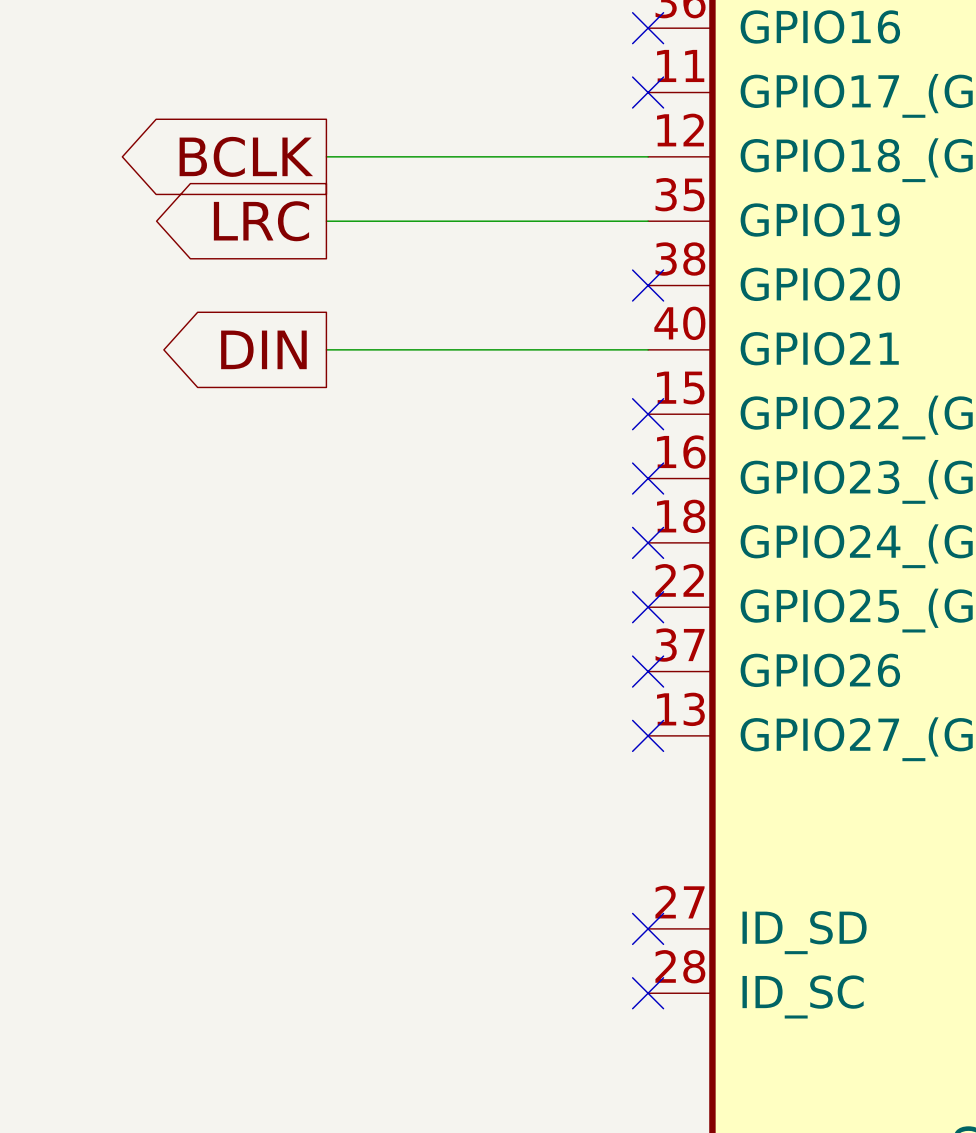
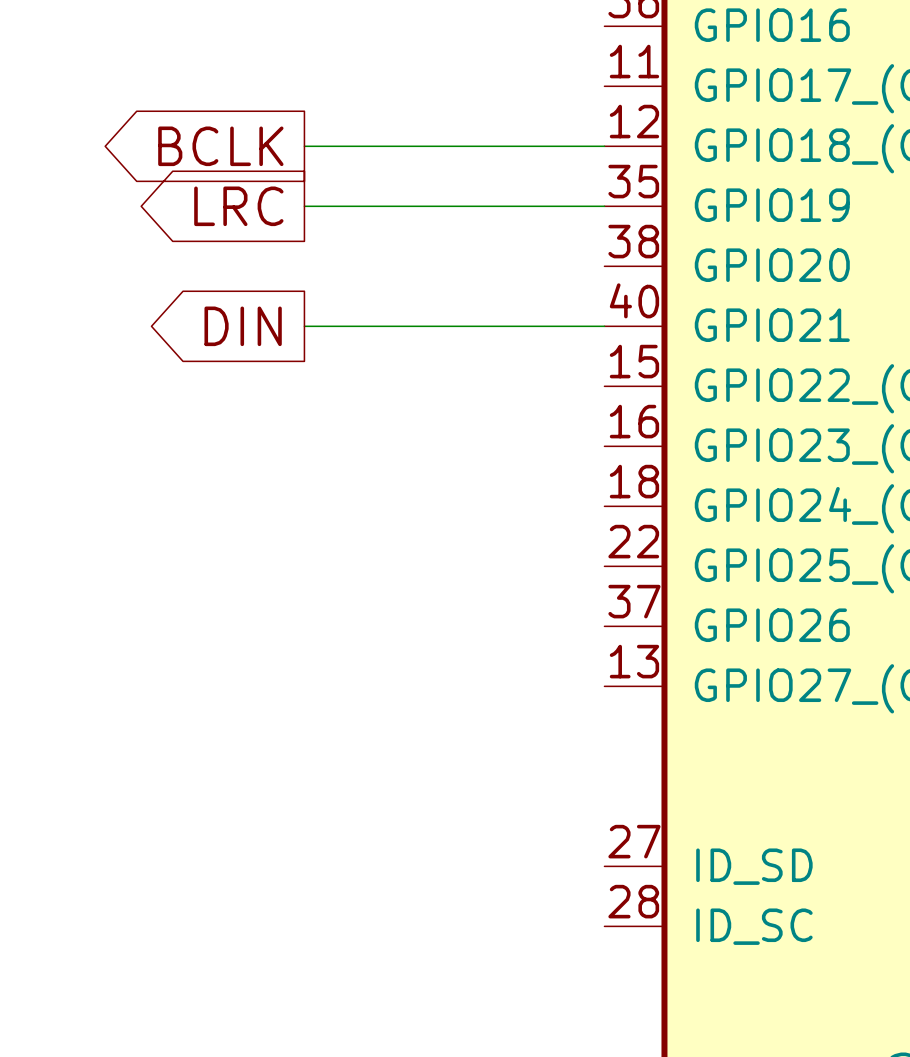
no-connect mark: (648, 28) -> none
no-connect mark: (648, 92) -> none
no-connect mark: (648, 285) -> none
no-connect mark: (648, 414) -> none
no-connect mark: (648, 478) -> none
no-connect mark: (648, 542) -> none
no-connect mark: (648, 607) -> none
no-connect mark: (648, 671) -> none
no-connect mark: (648, 735) -> none
no-connect mark: (648, 928) -> none
no-connect mark: (648, 993) -> none

